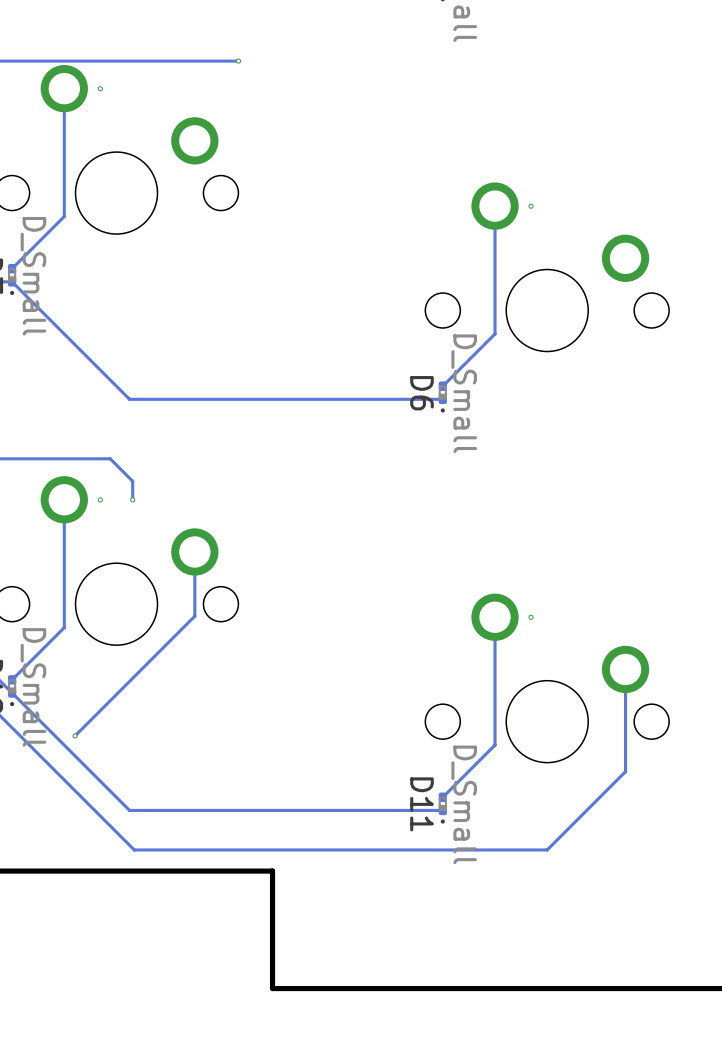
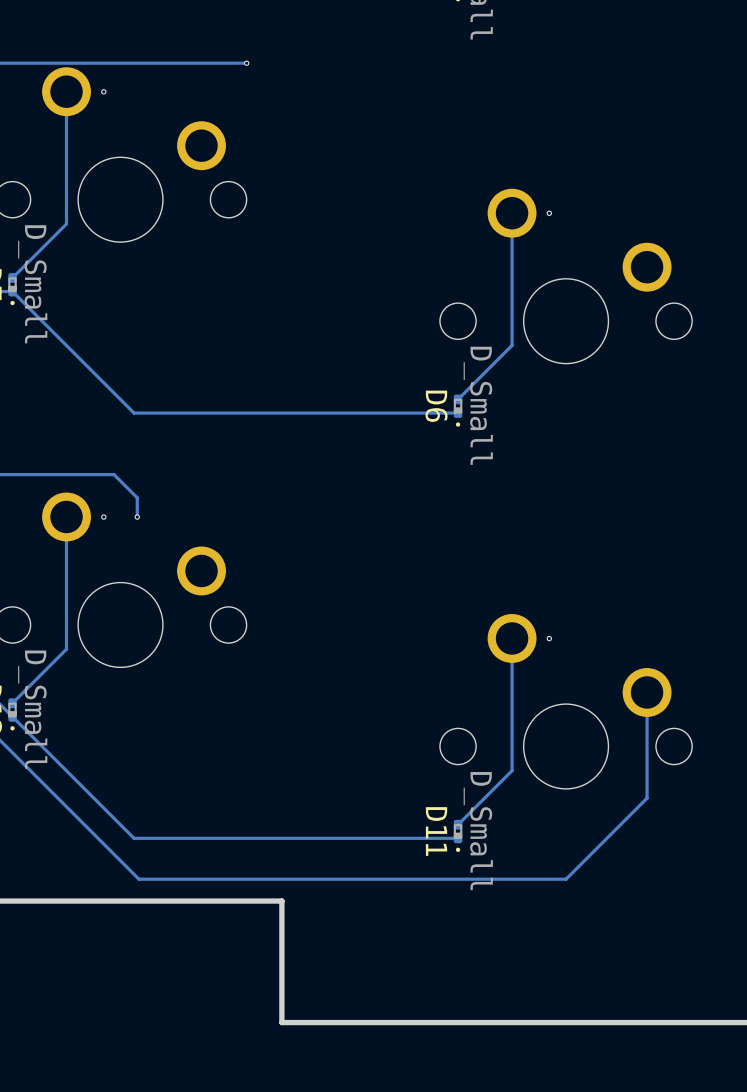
track: (194, 551) (194, 616) (75, 735) -> none
via: (75, 735) -> none

